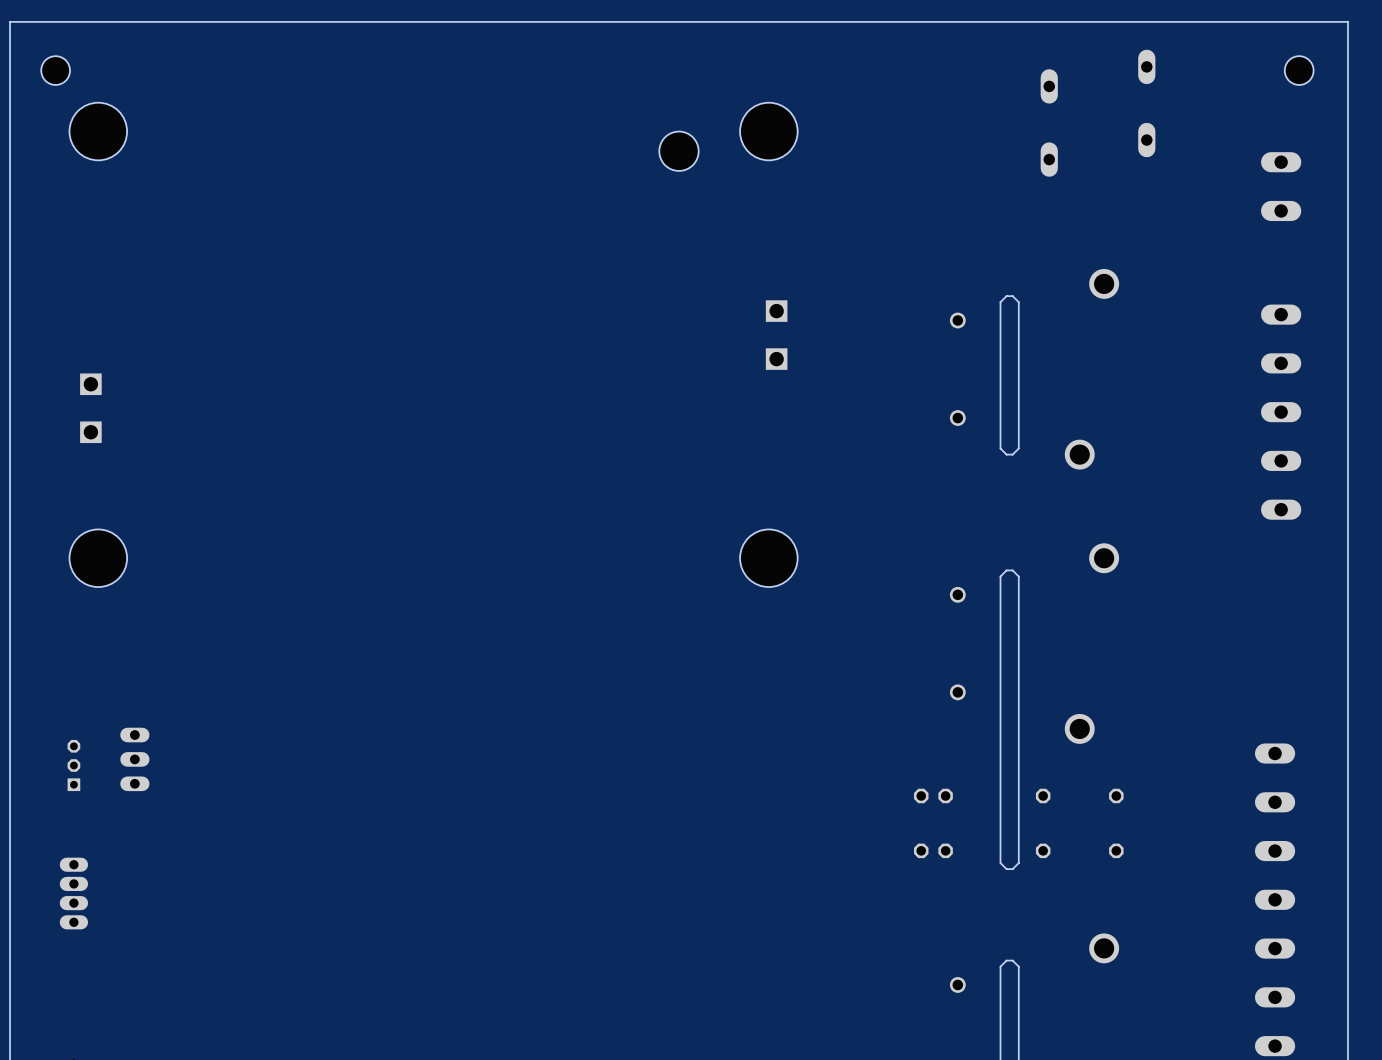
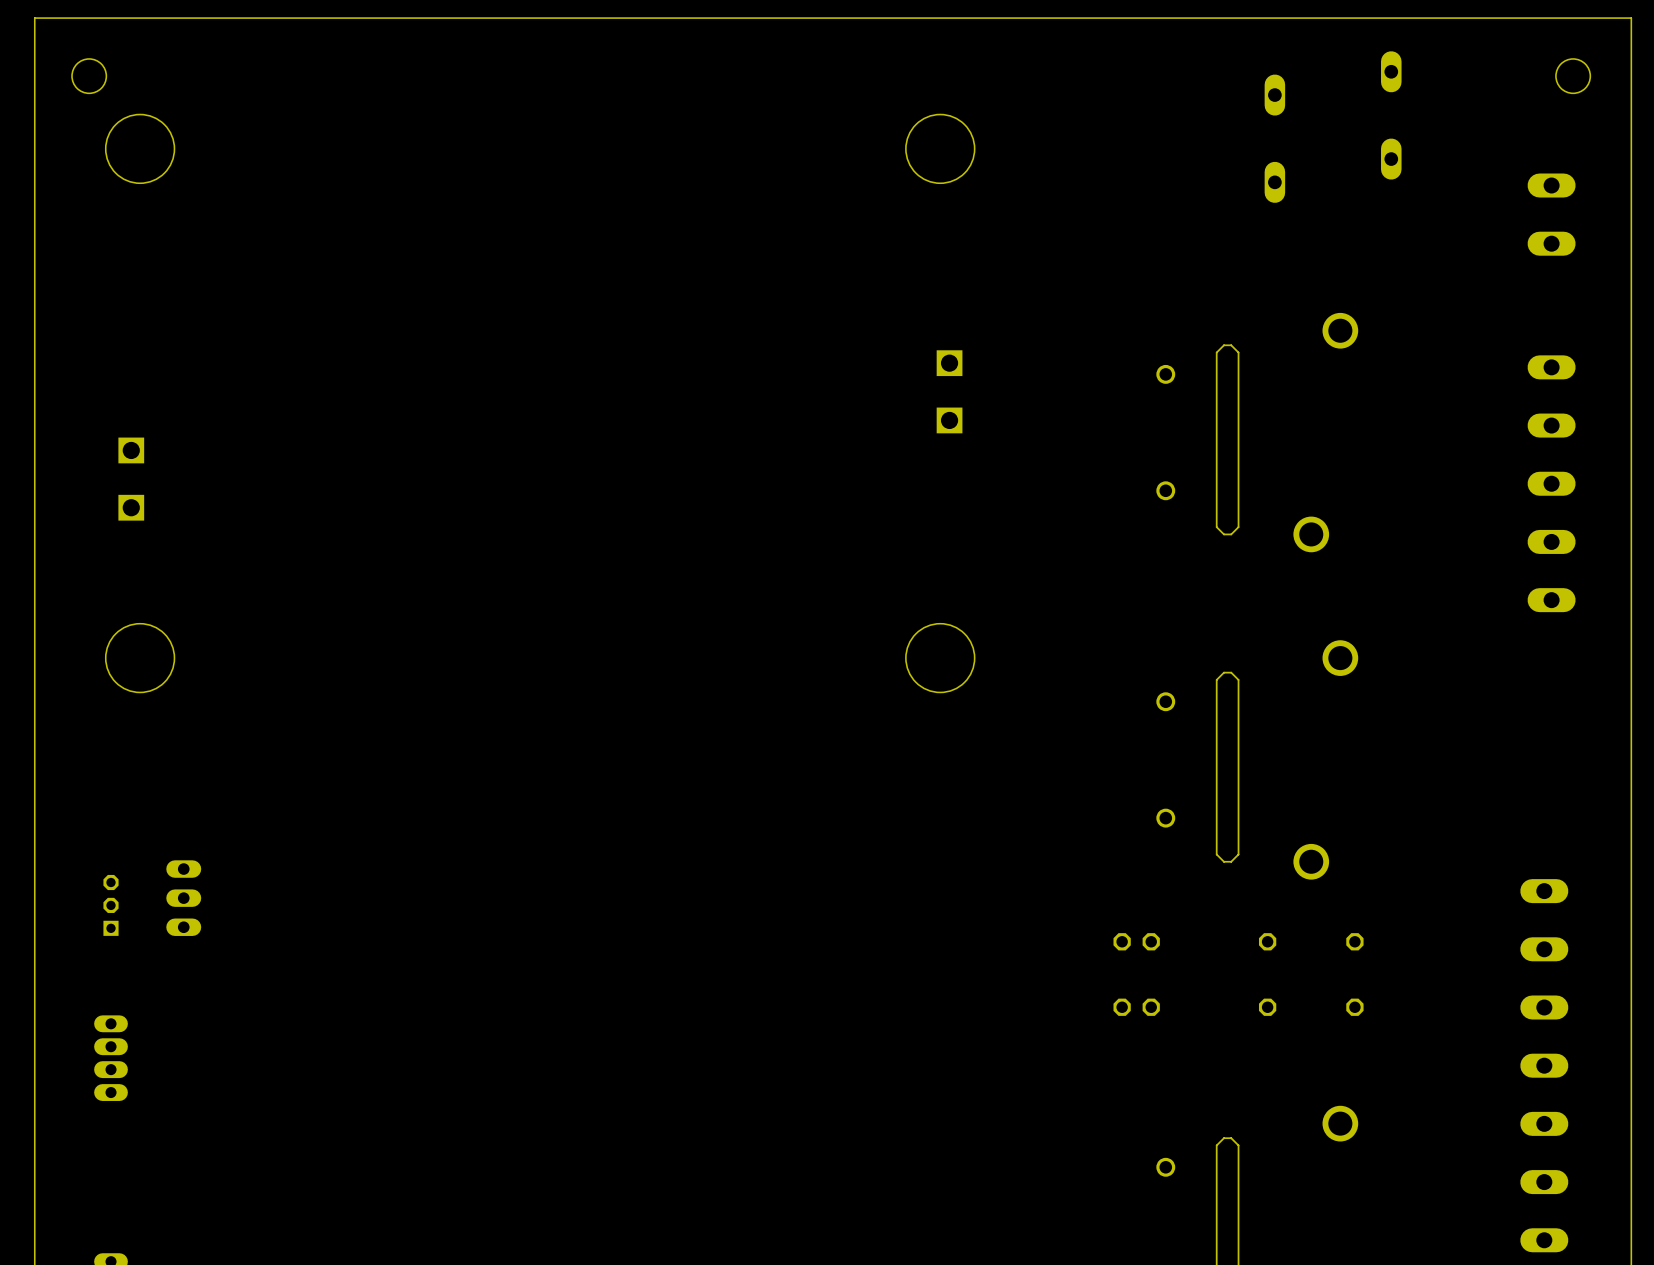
part: (678, 151) -> none
board edge: (1018, 722) (1018, 863) (1012, 869) (1006, 869) (1000, 863) (1000, 722) -> (1238, 854) (1231, 861) (1223, 861) (1216, 854)

